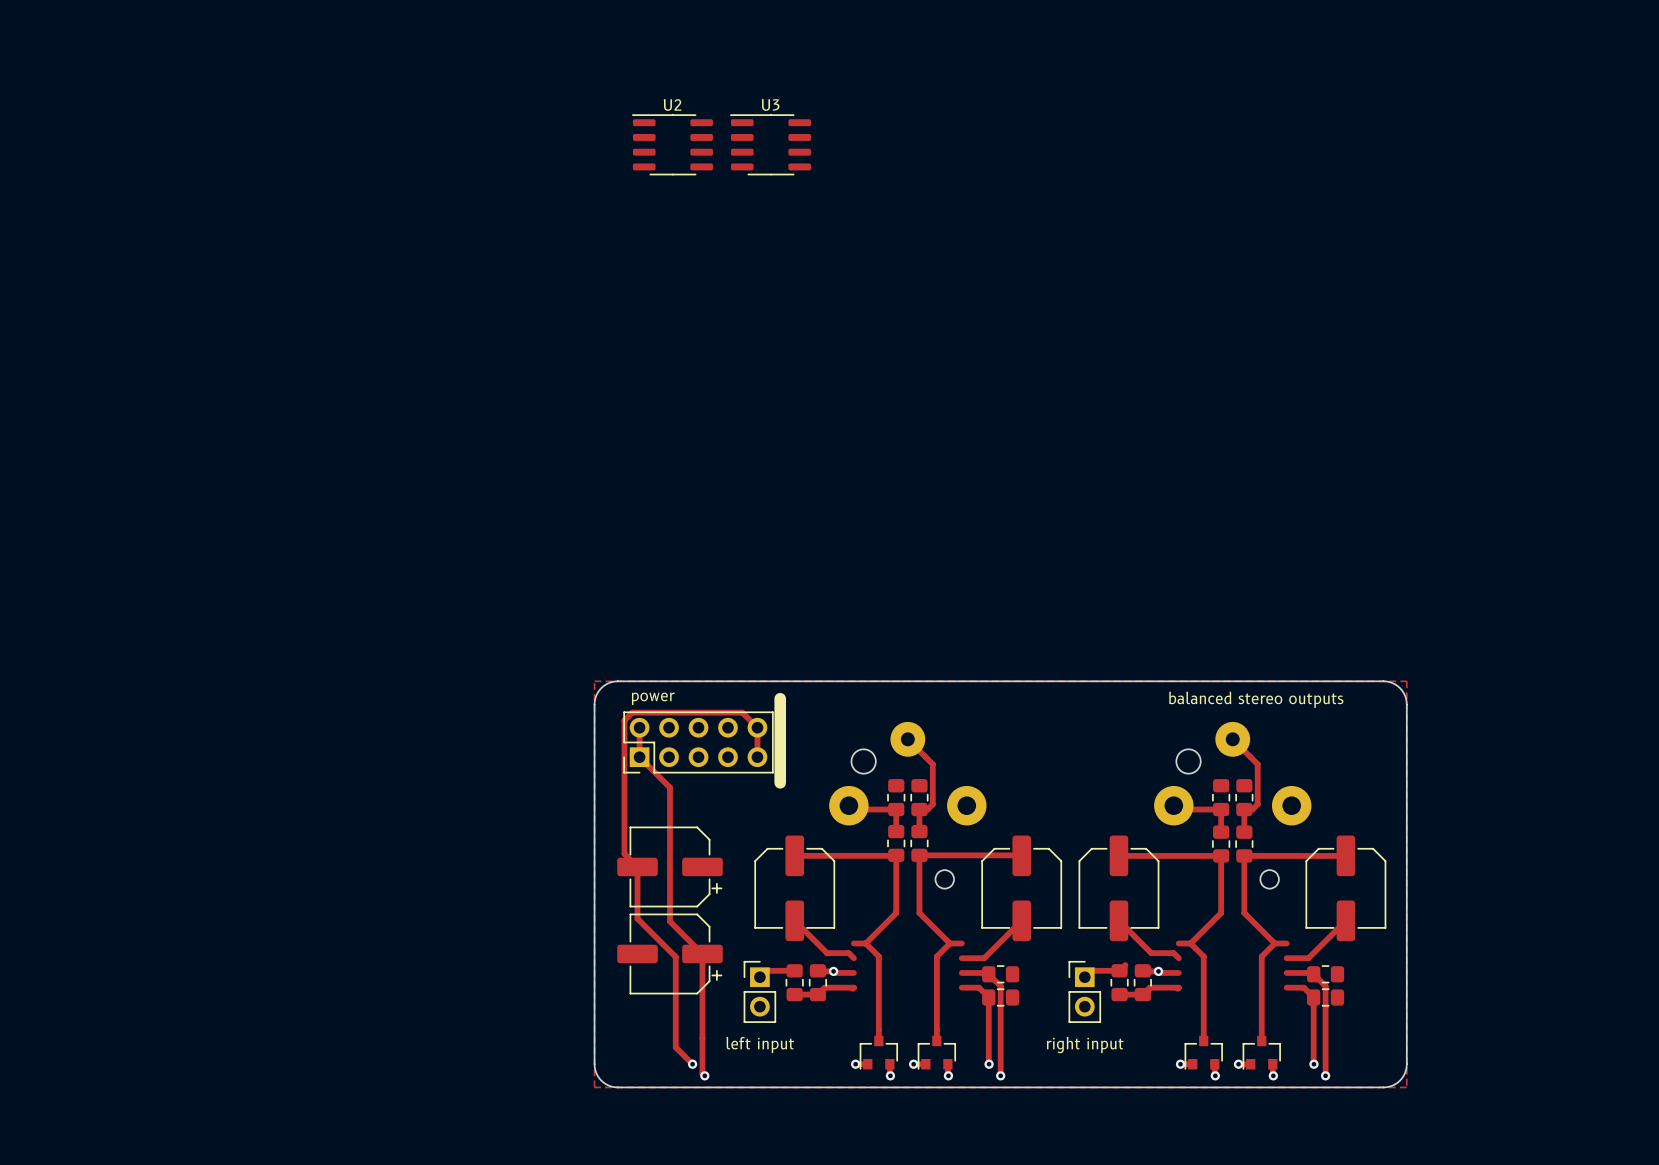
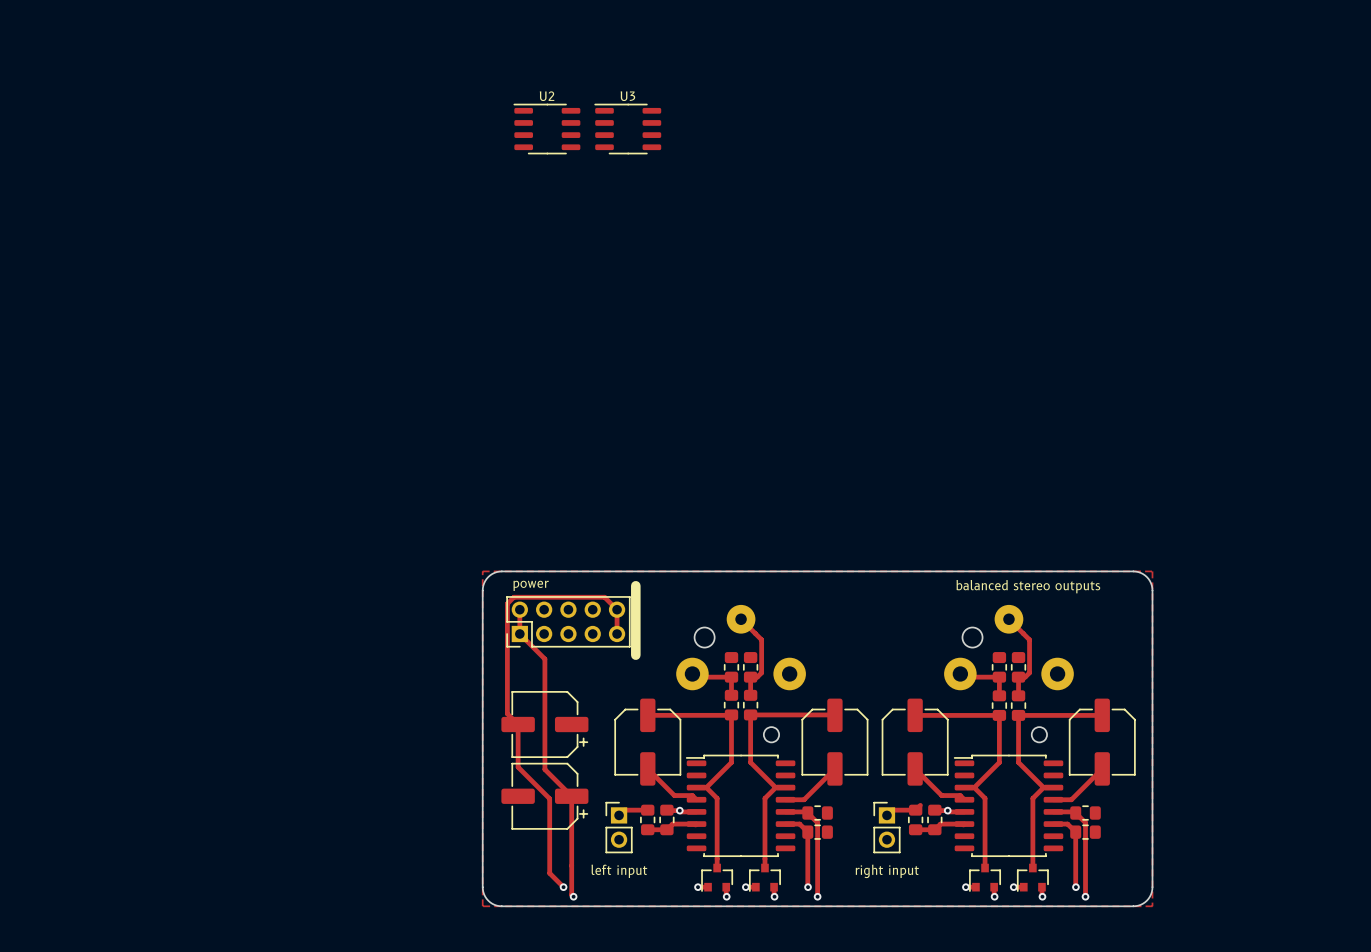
part: none -> (740, 805)
part: none -> (1008, 805)

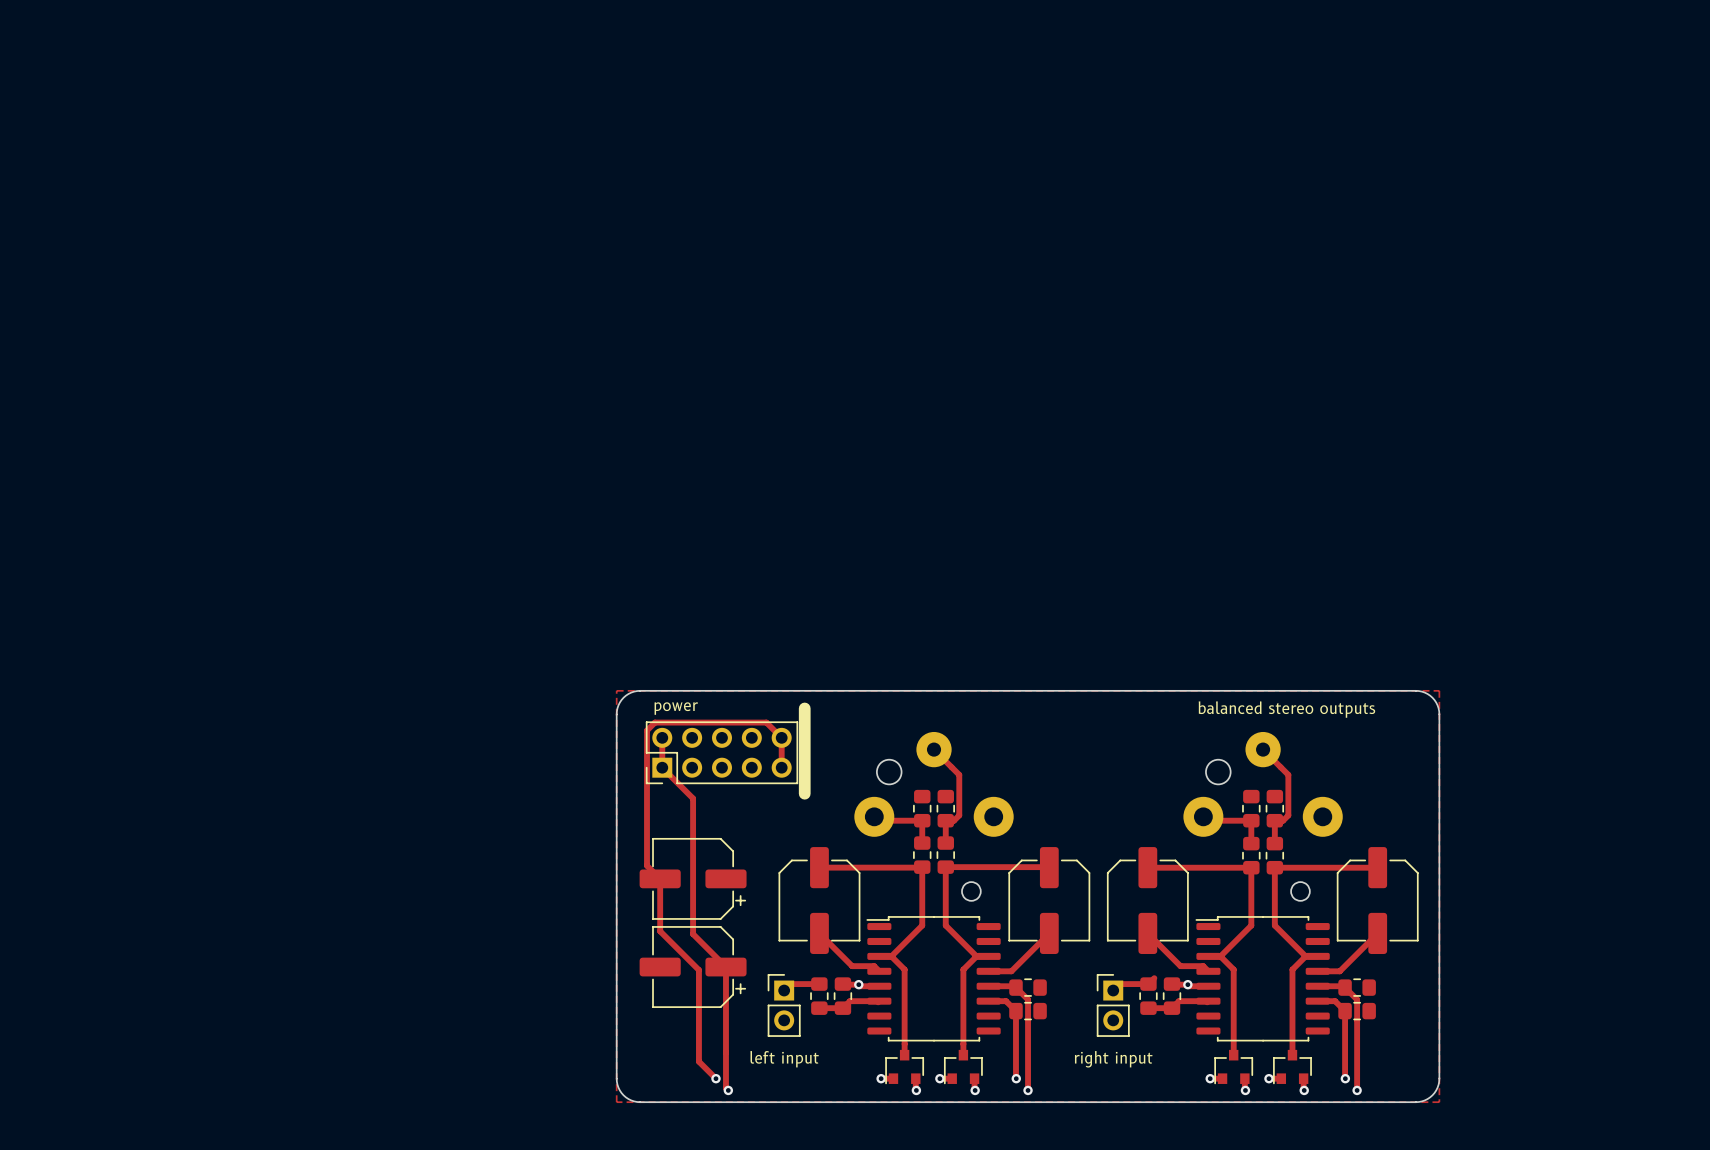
U2: (547, 129) -> none
U3: (627, 129) -> none

